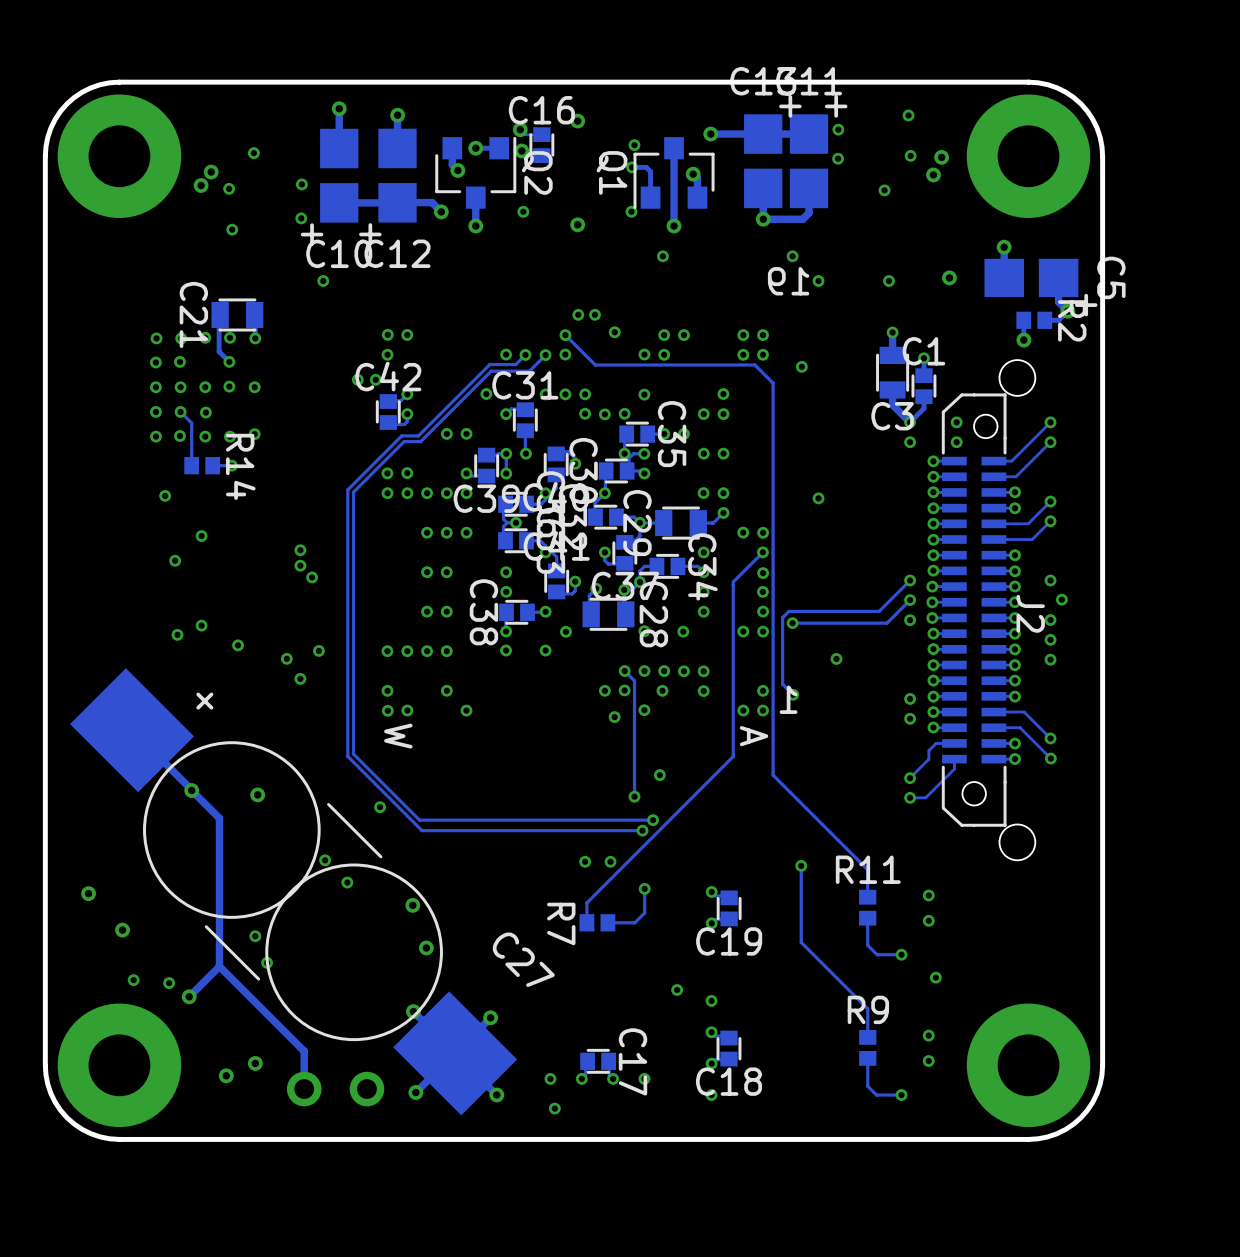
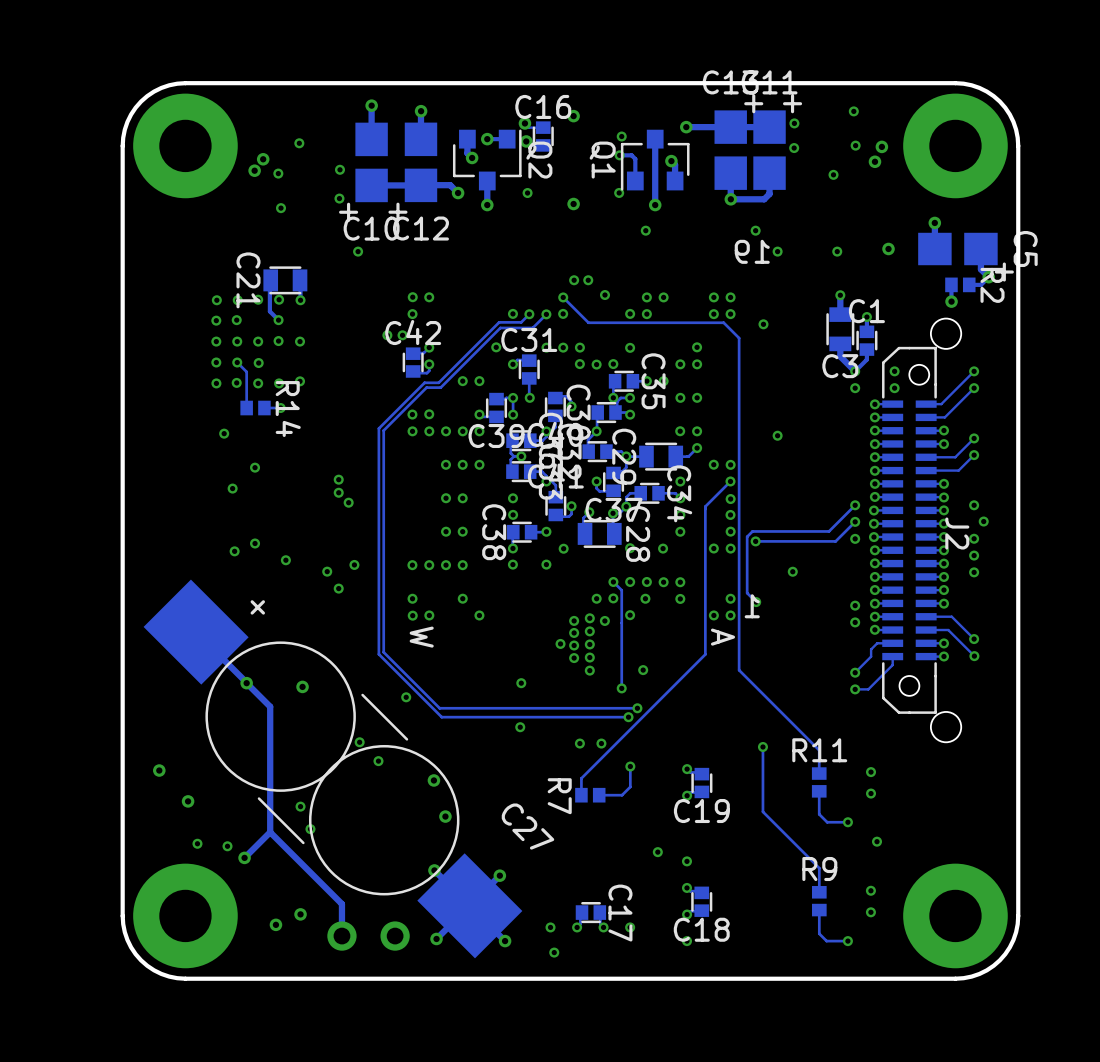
via: none -> (589, 618)
via: none -> (574, 620)
via: none -> (589, 631)
via: none -> (574, 632)
via: none -> (560, 643)
via: none -> (589, 644)
via: none -> (574, 645)
via: none -> (574, 658)
via: none -> (589, 657)
via: none -> (589, 670)
via: none -> (521, 683)
via: none -> (520, 727)

